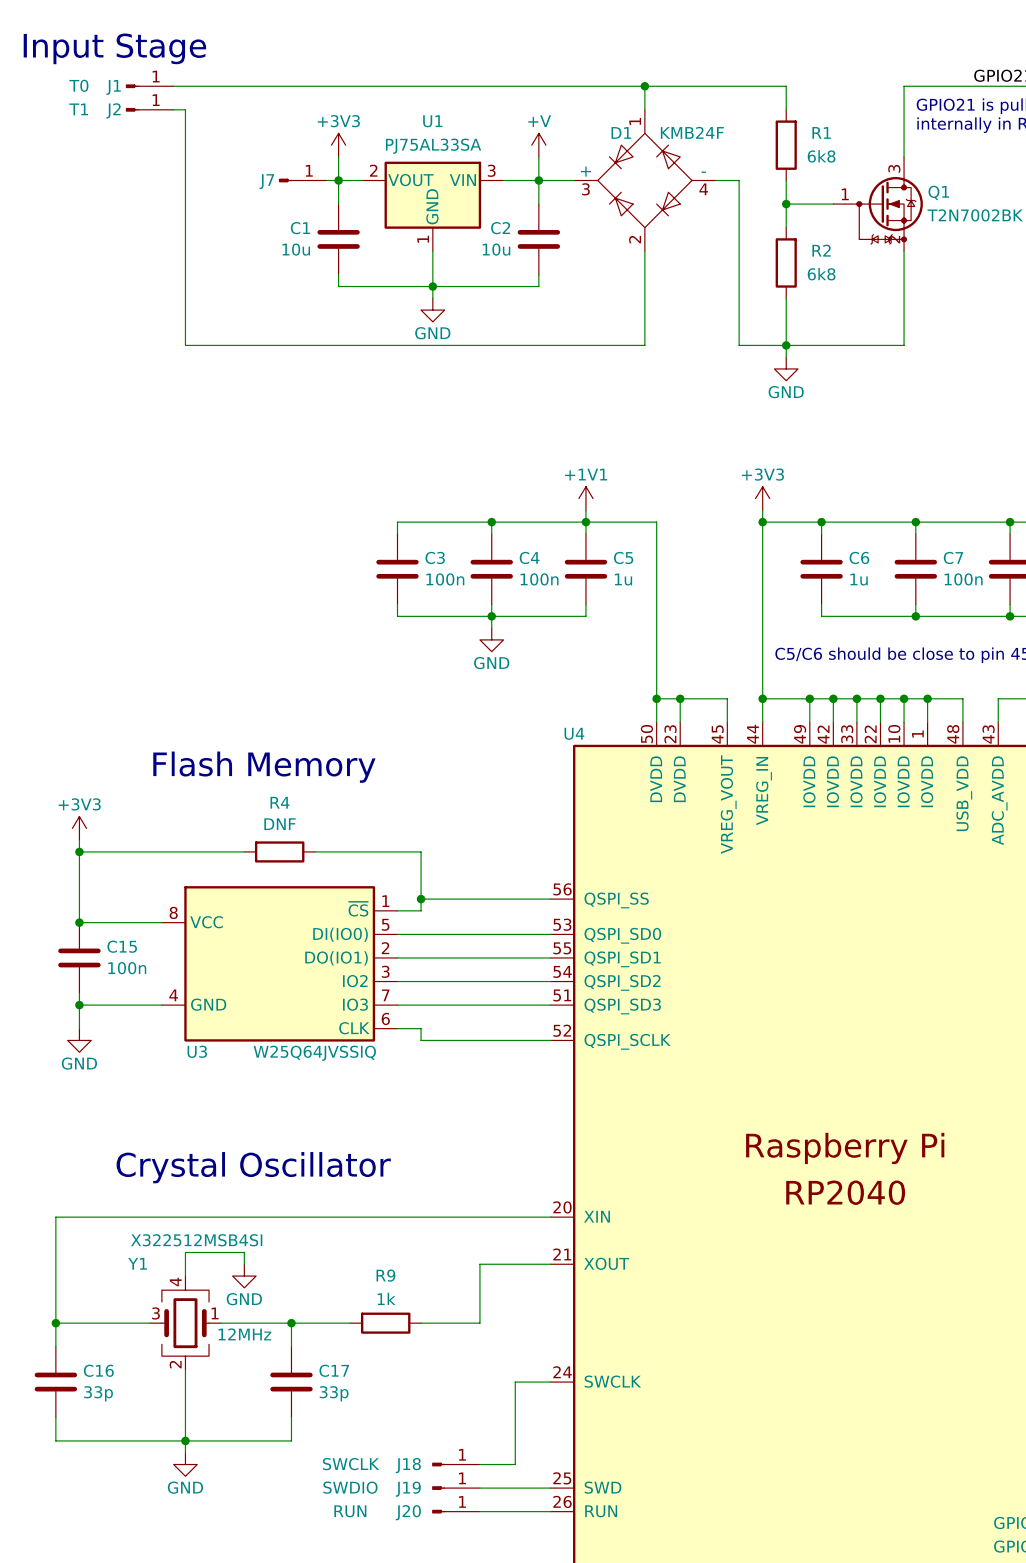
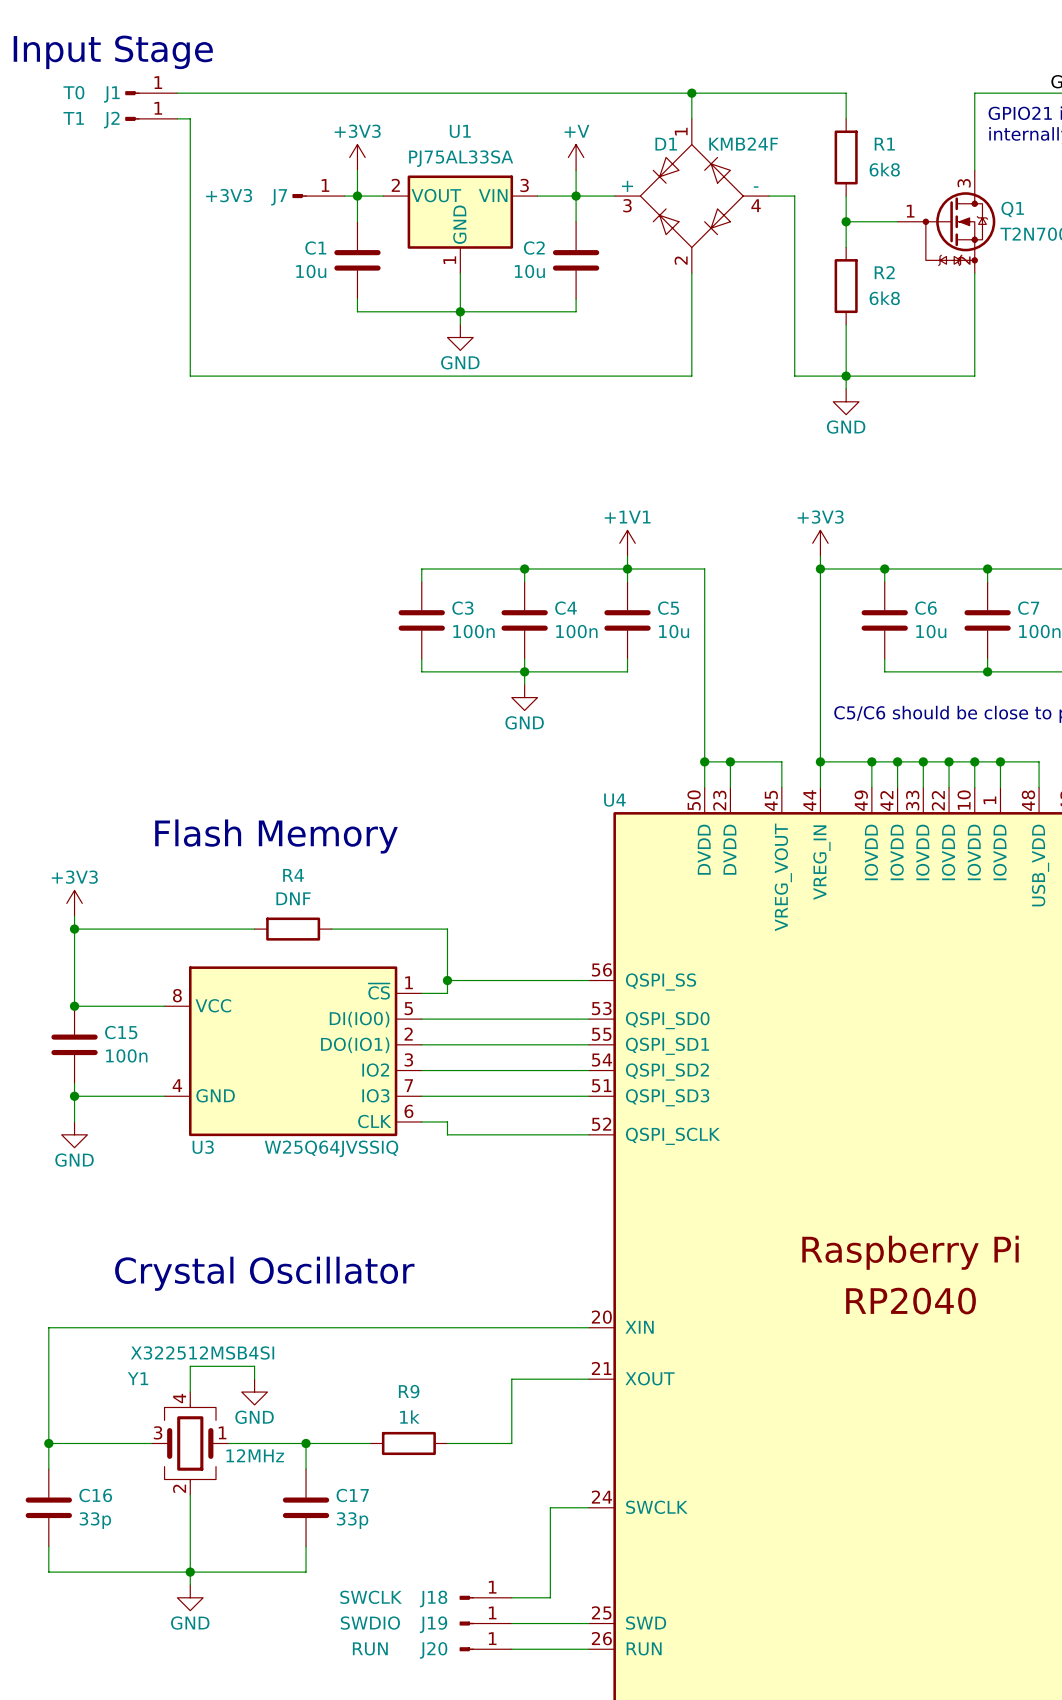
J7 value: none -> +3V3 (229, 195)
C5 value: 1u (623, 579) -> 10u (674, 631)
C6 value: 1u (859, 579) -> 10u (931, 631)

